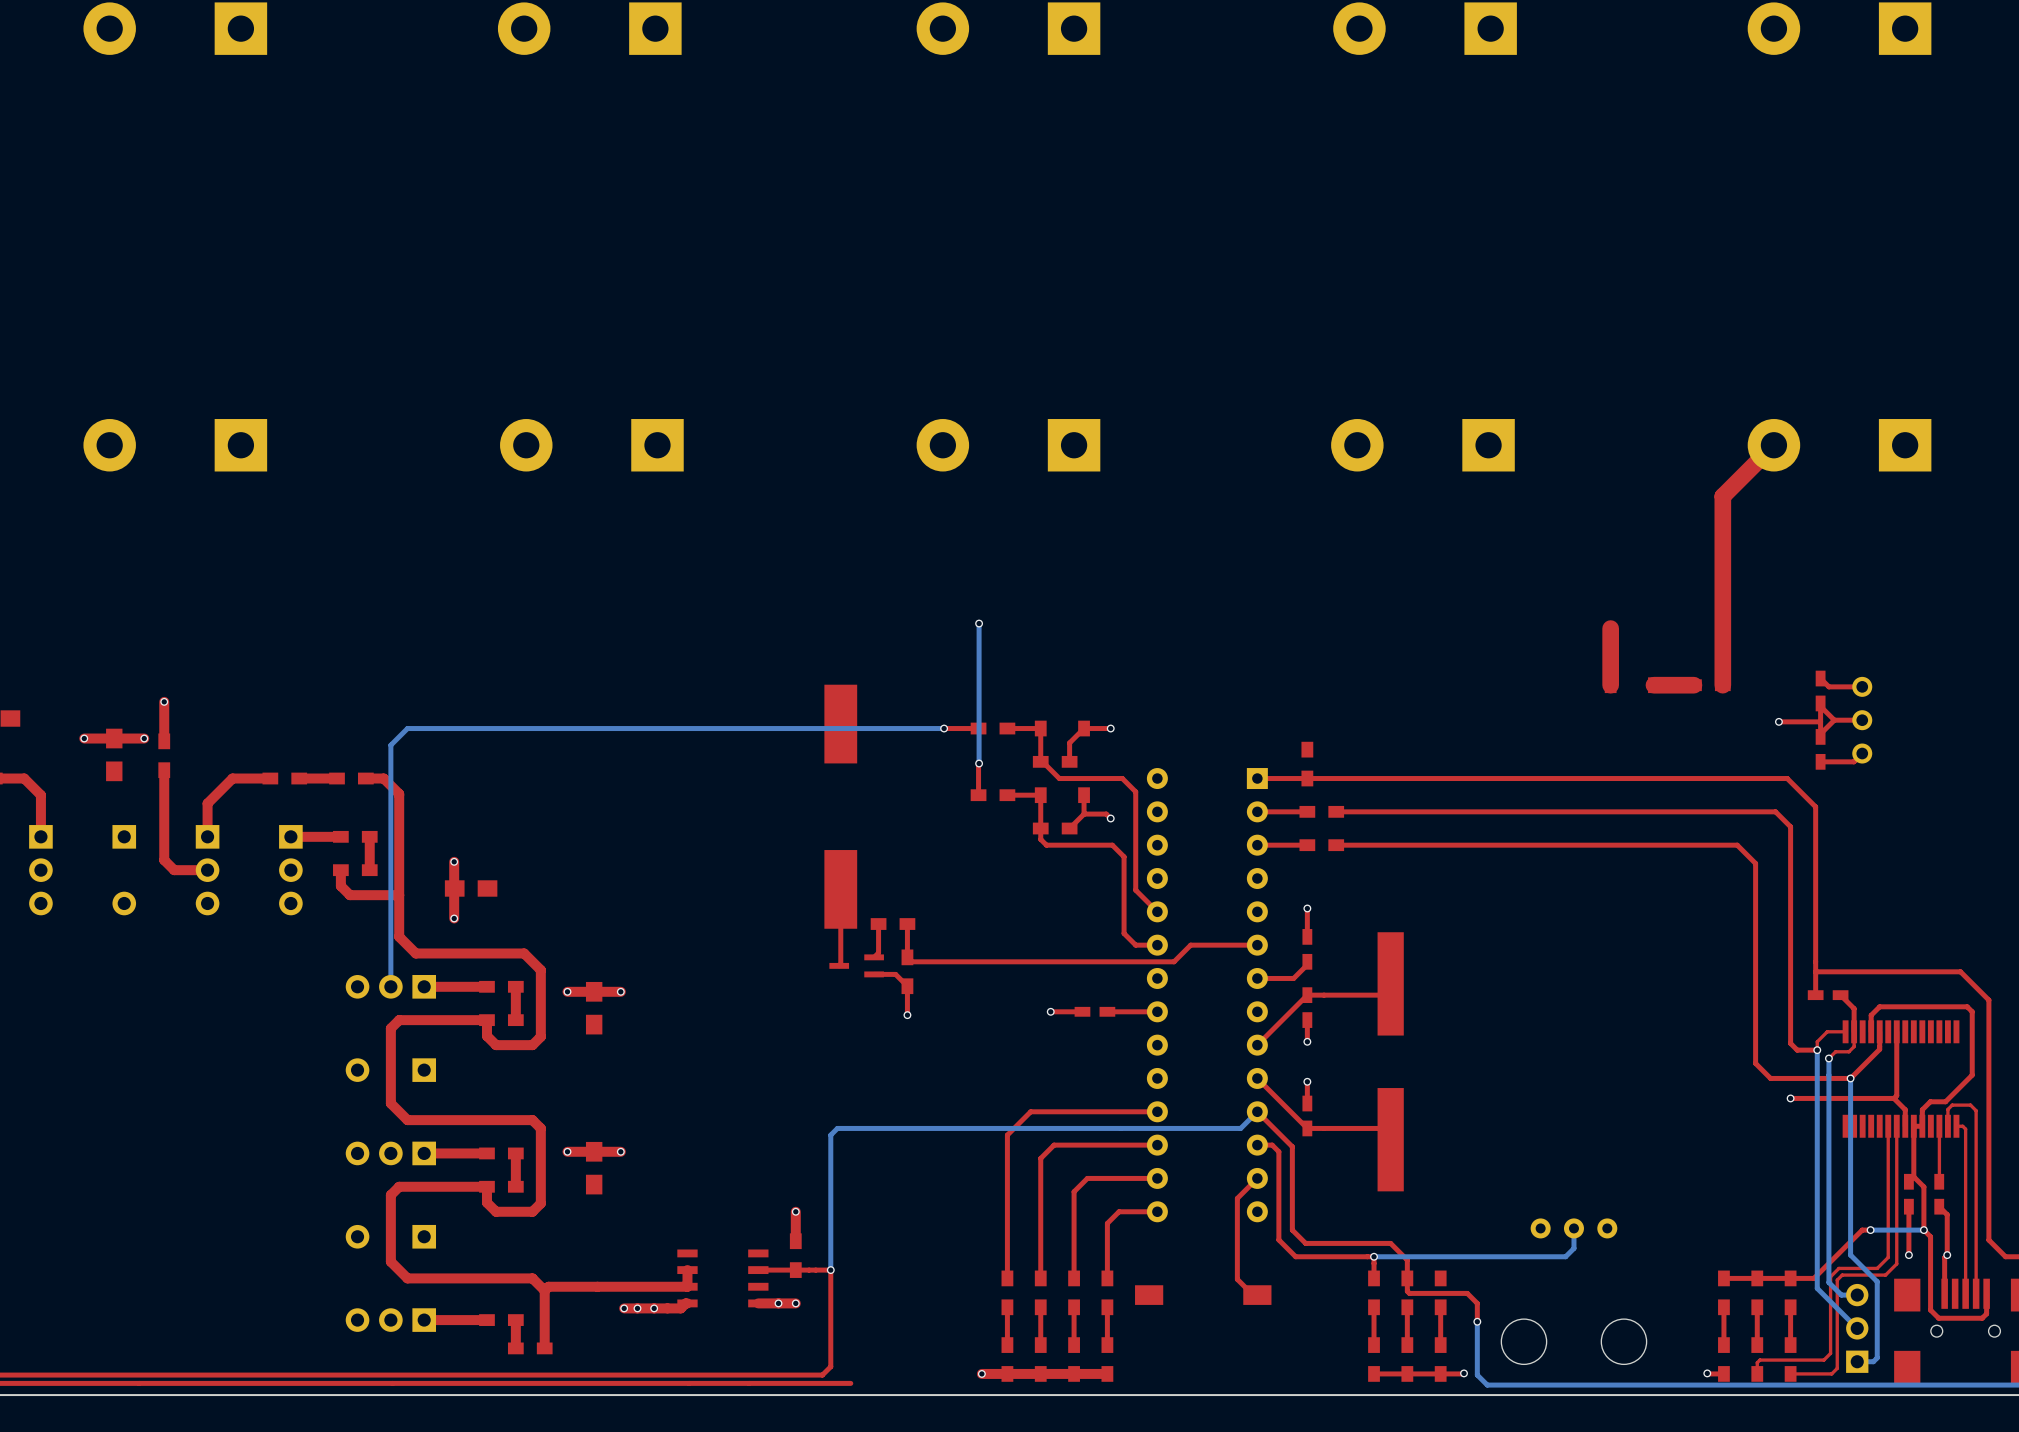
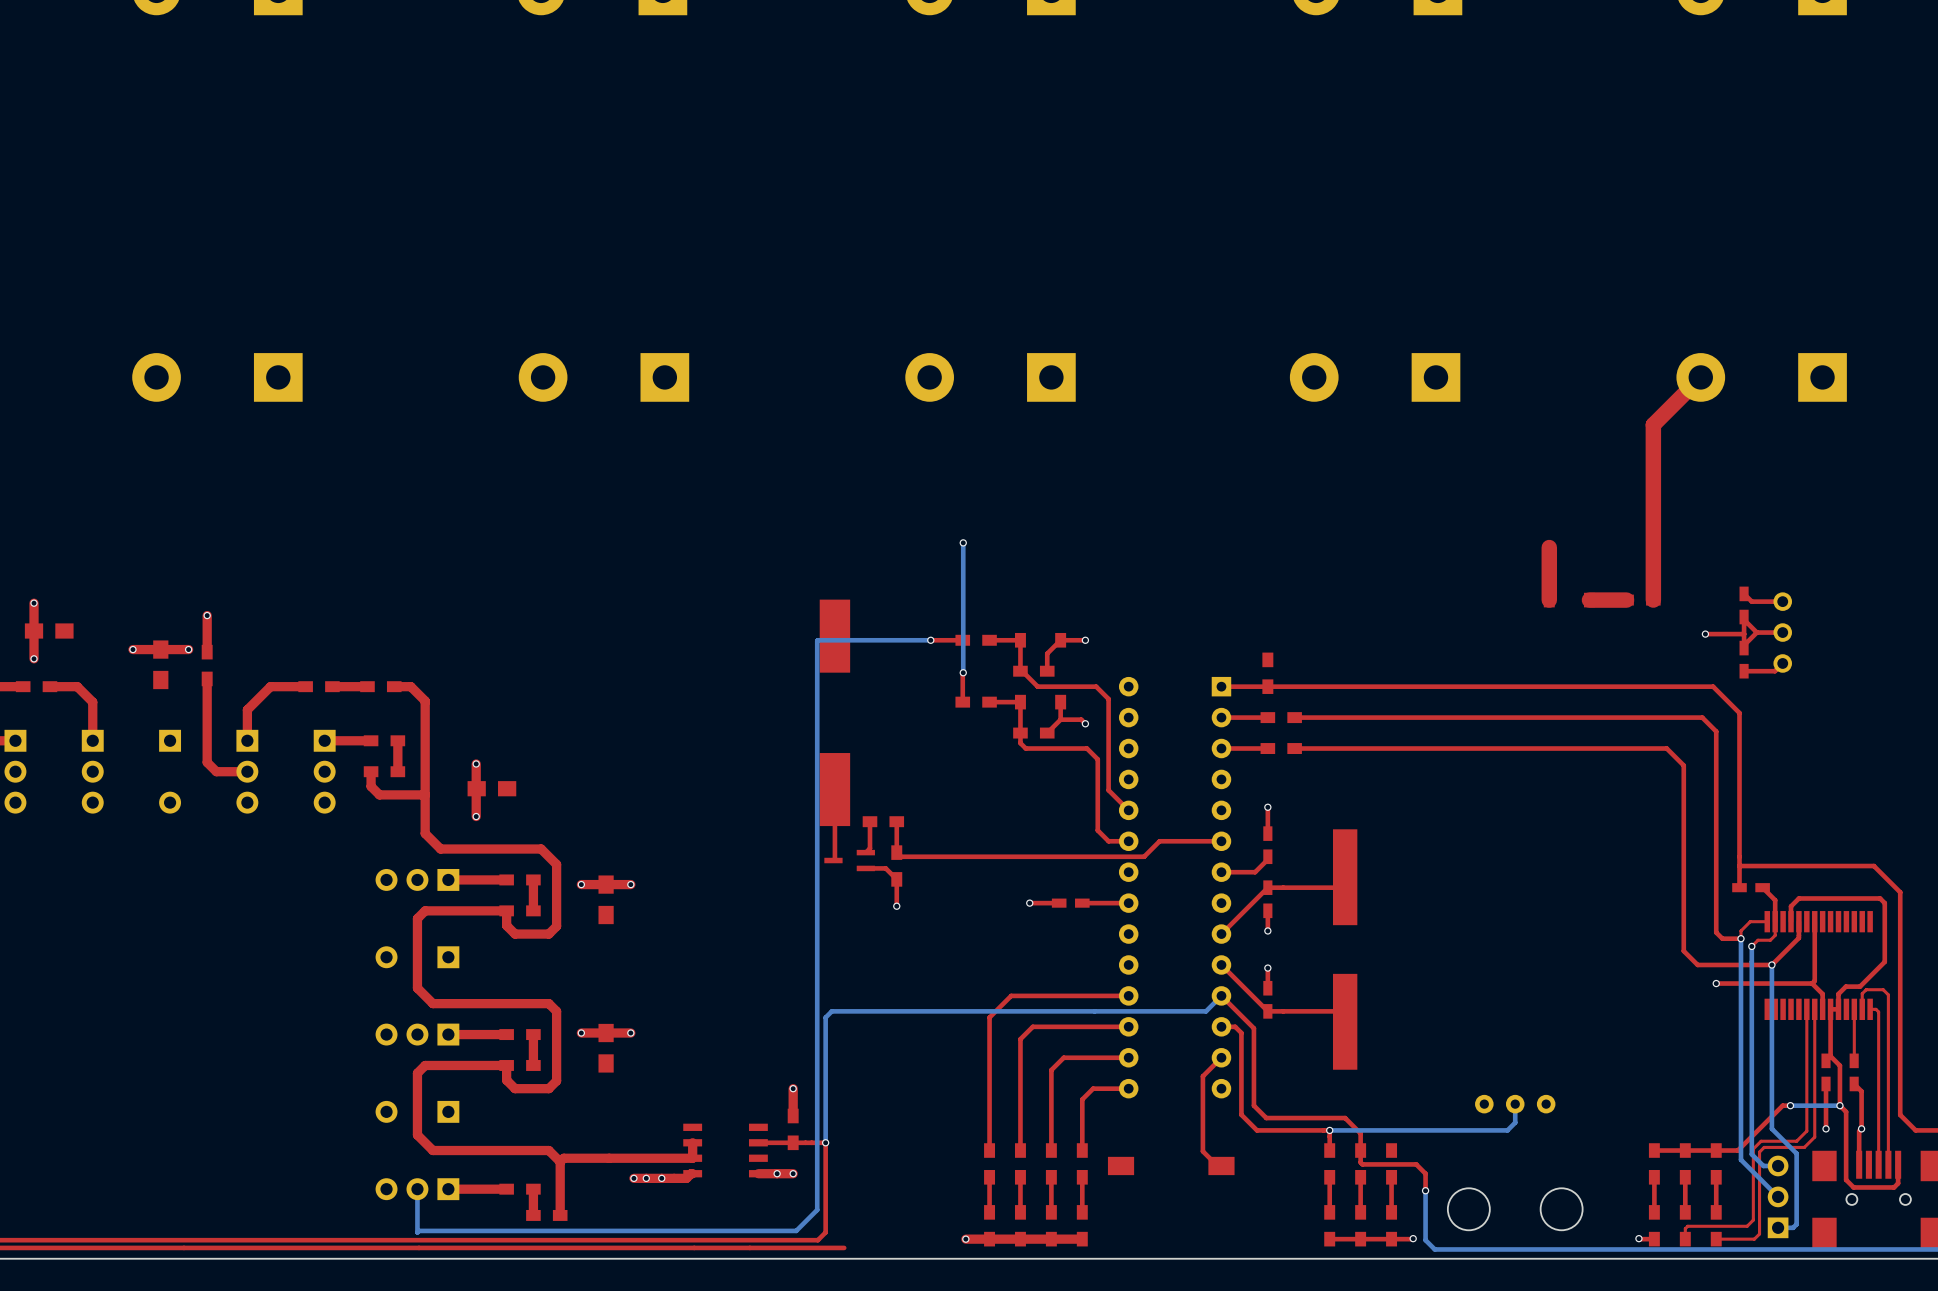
bottom track: (822, 728) (407, 728) (390, 745) (390, 986) -> (817, 640) (817, 1209) (796, 1230) (419, 1230) (417, 1232) (417, 1189)

